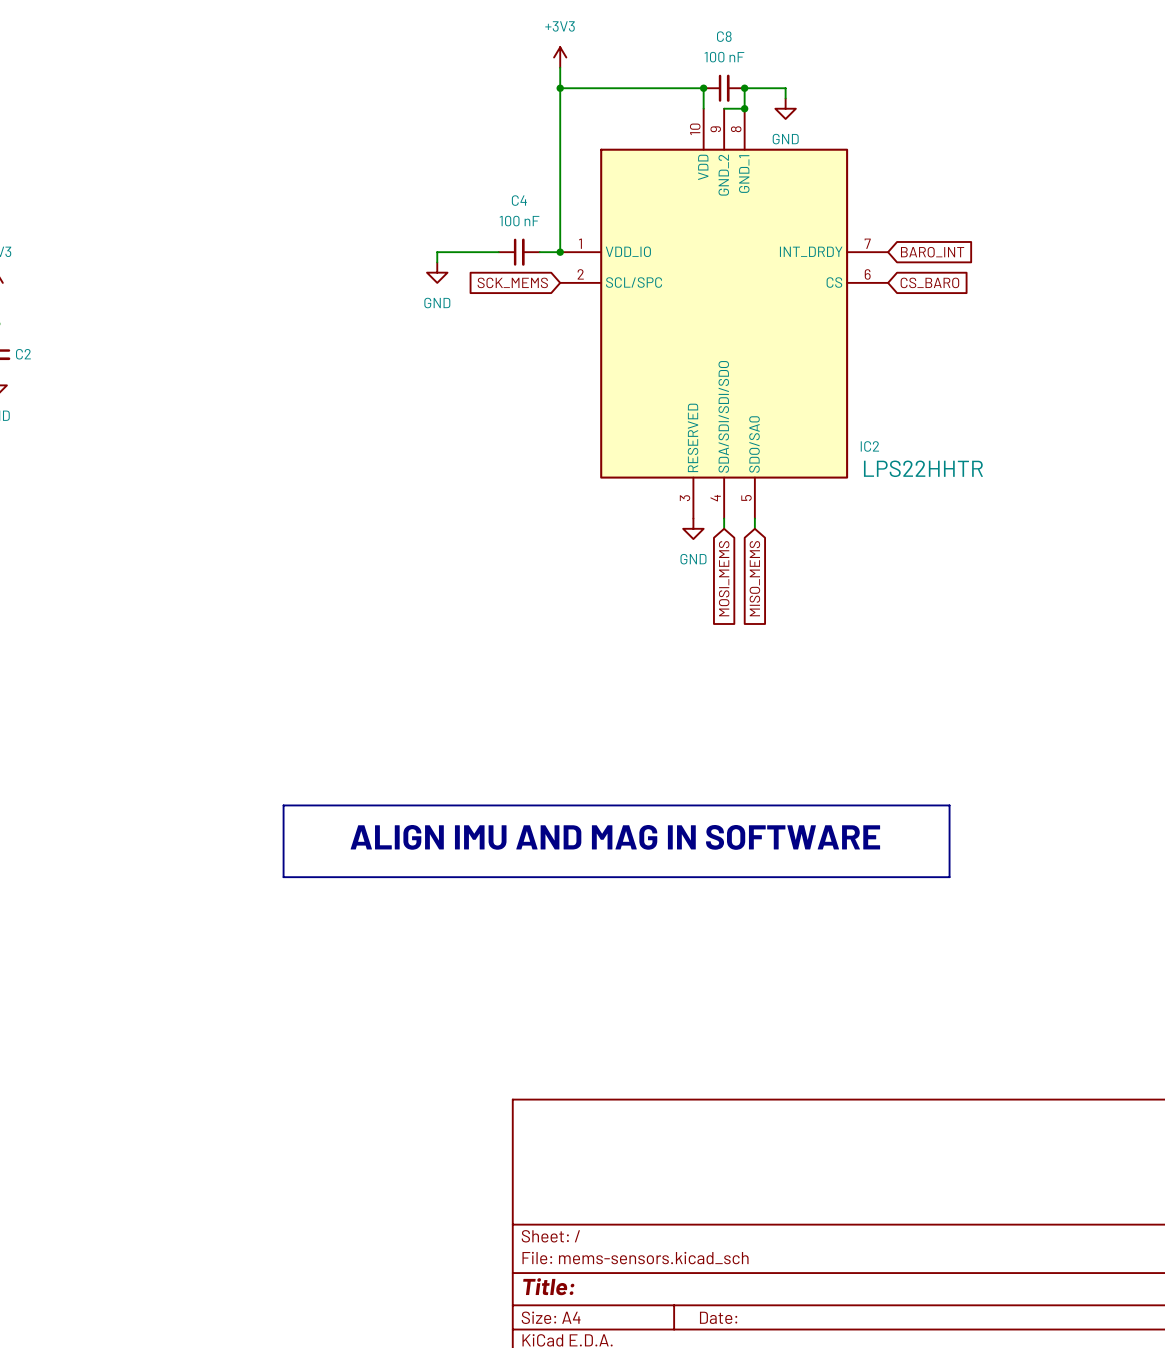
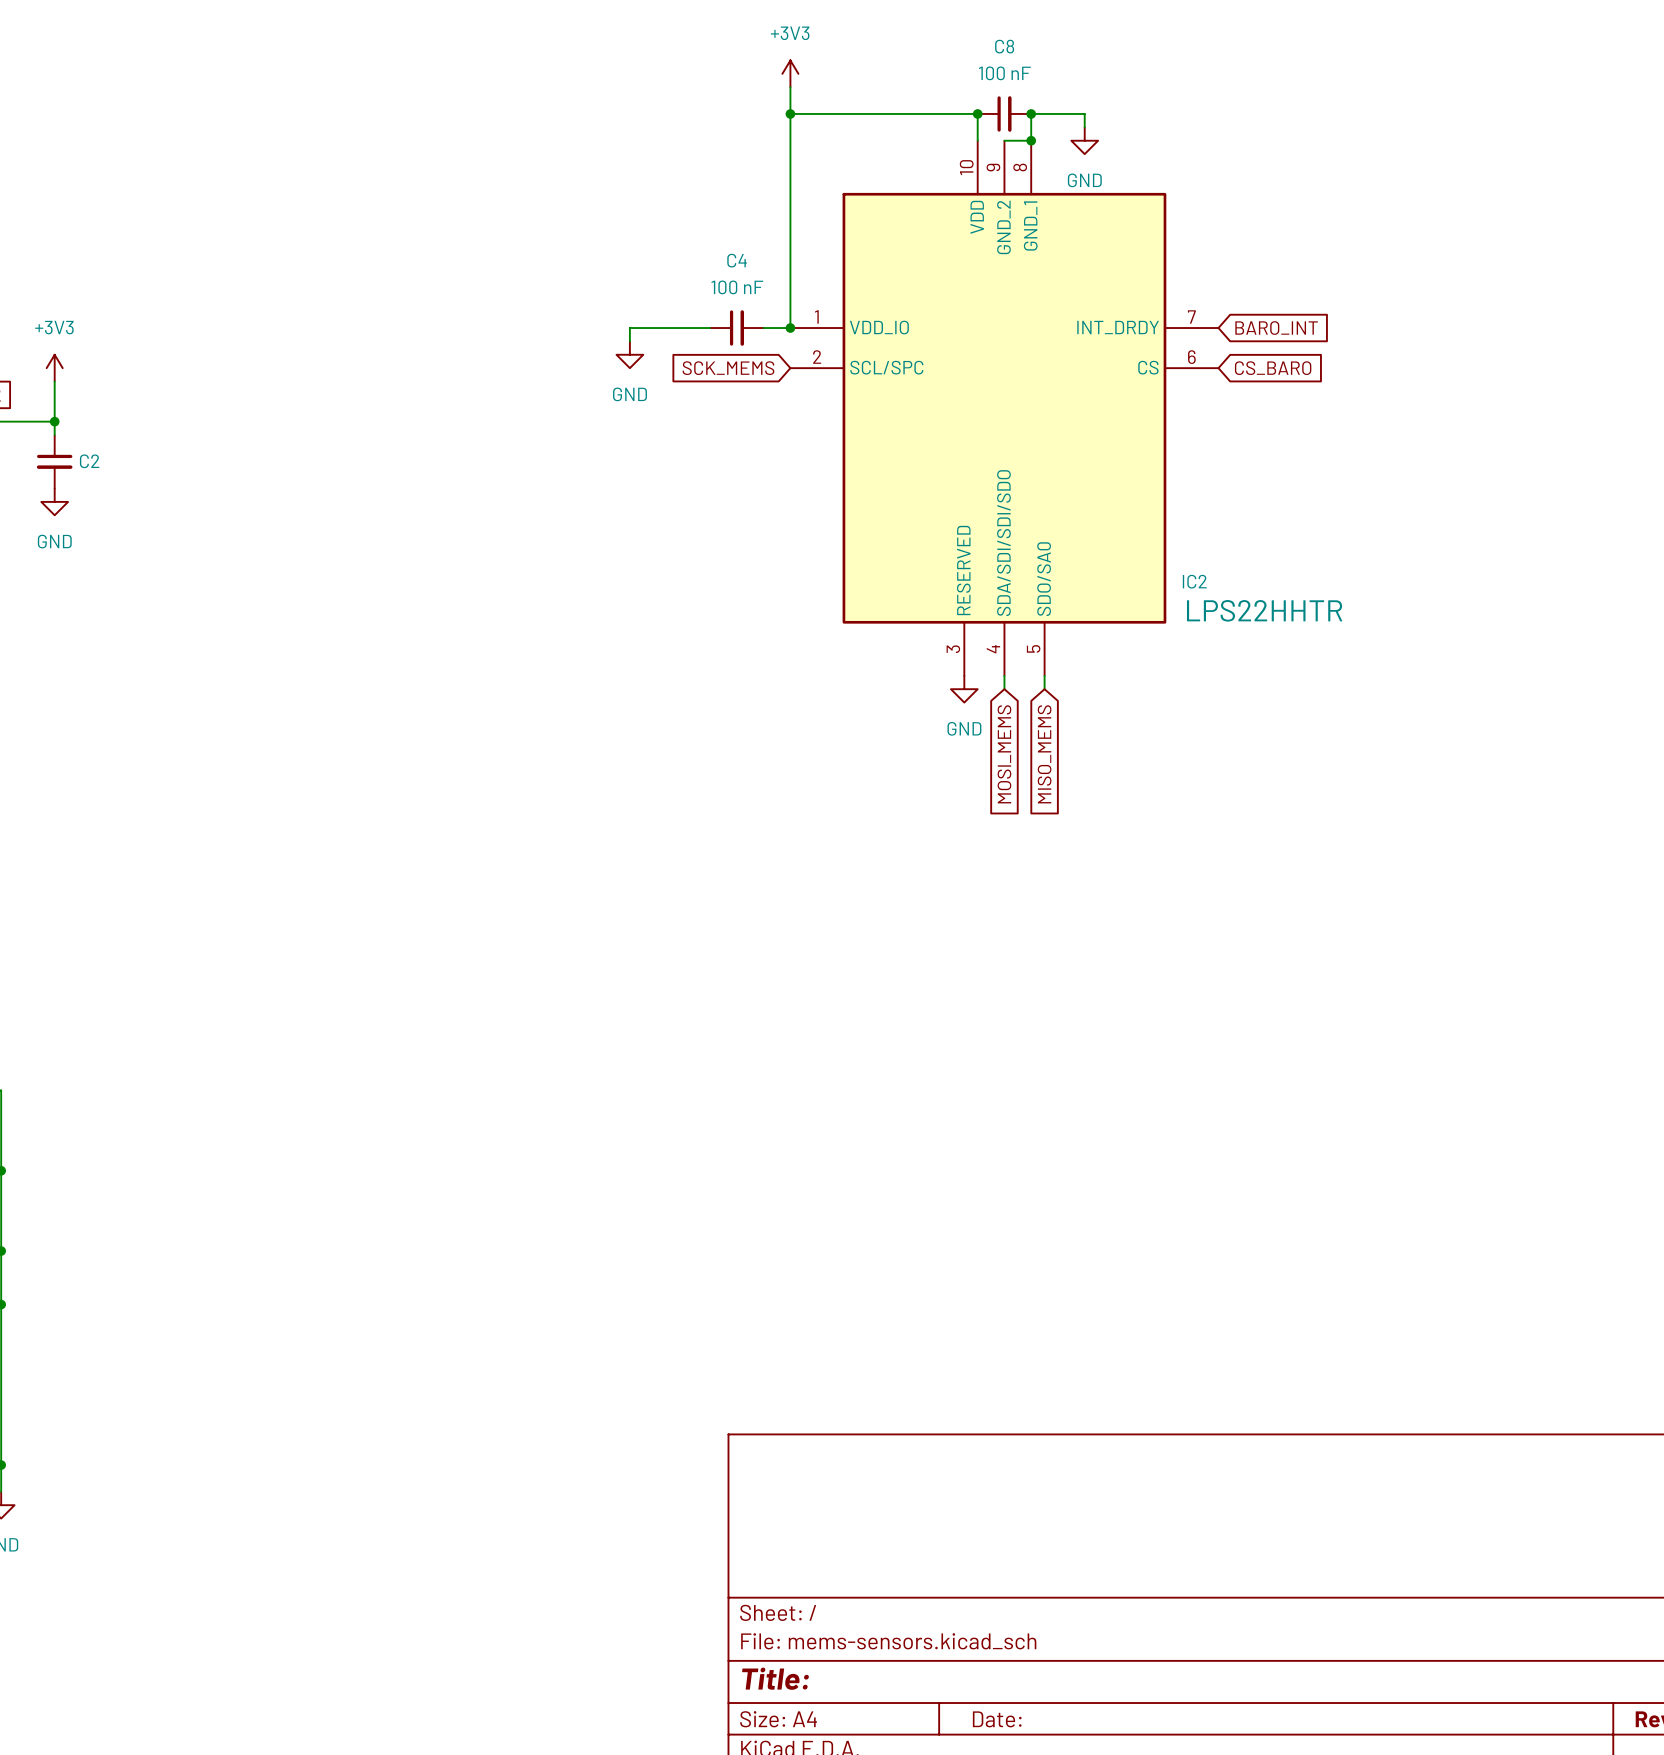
line: (283, 805) (949, 805) (949, 877) (283, 877) (283, 805) -> none
text: ALIGN IMU AND MAG IN SOFTWARE (615, 837) -> none

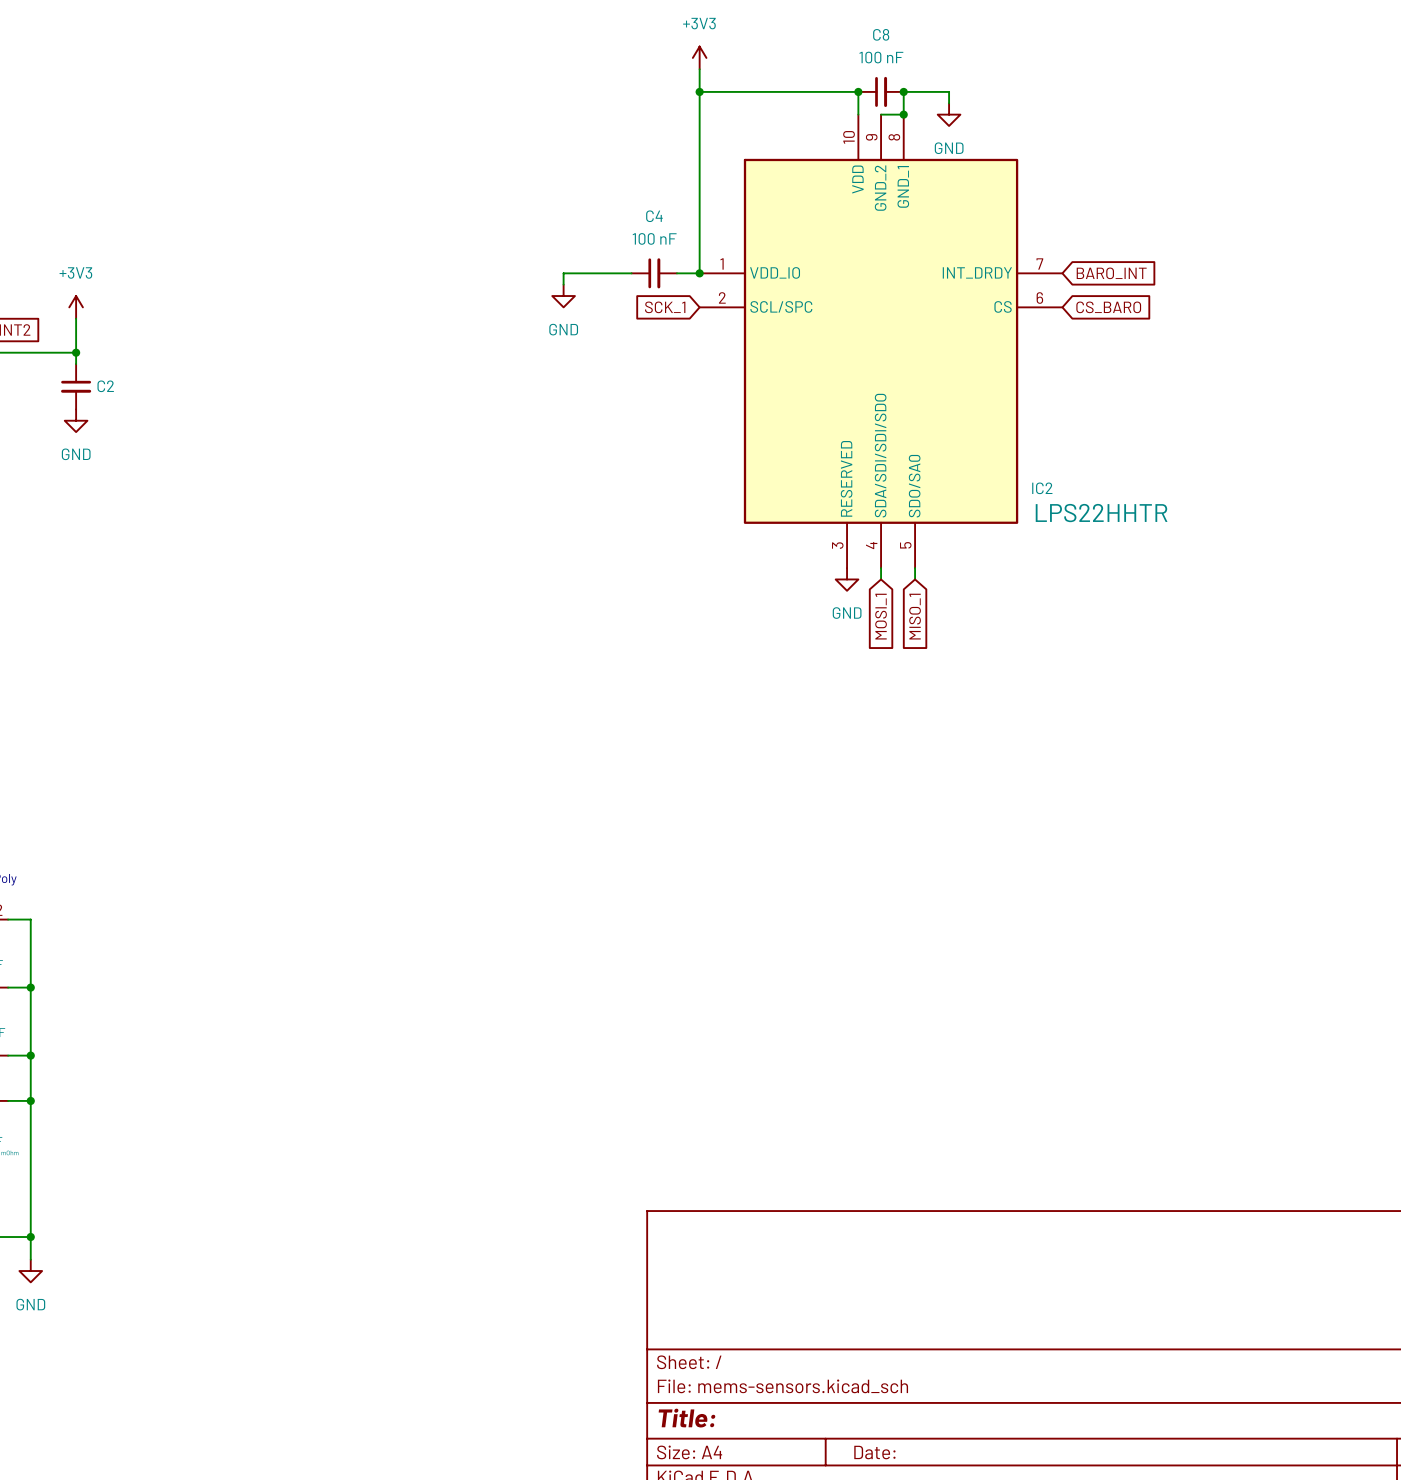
global label: SCK_MEMS (728, 368) -> SCK_1 (665, 307)
global label: MOSI_MEMS (1004, 754) -> MOSI_1 (881, 616)
global label: MISO_MEMS (1044, 754) -> MISO_1 (915, 616)

